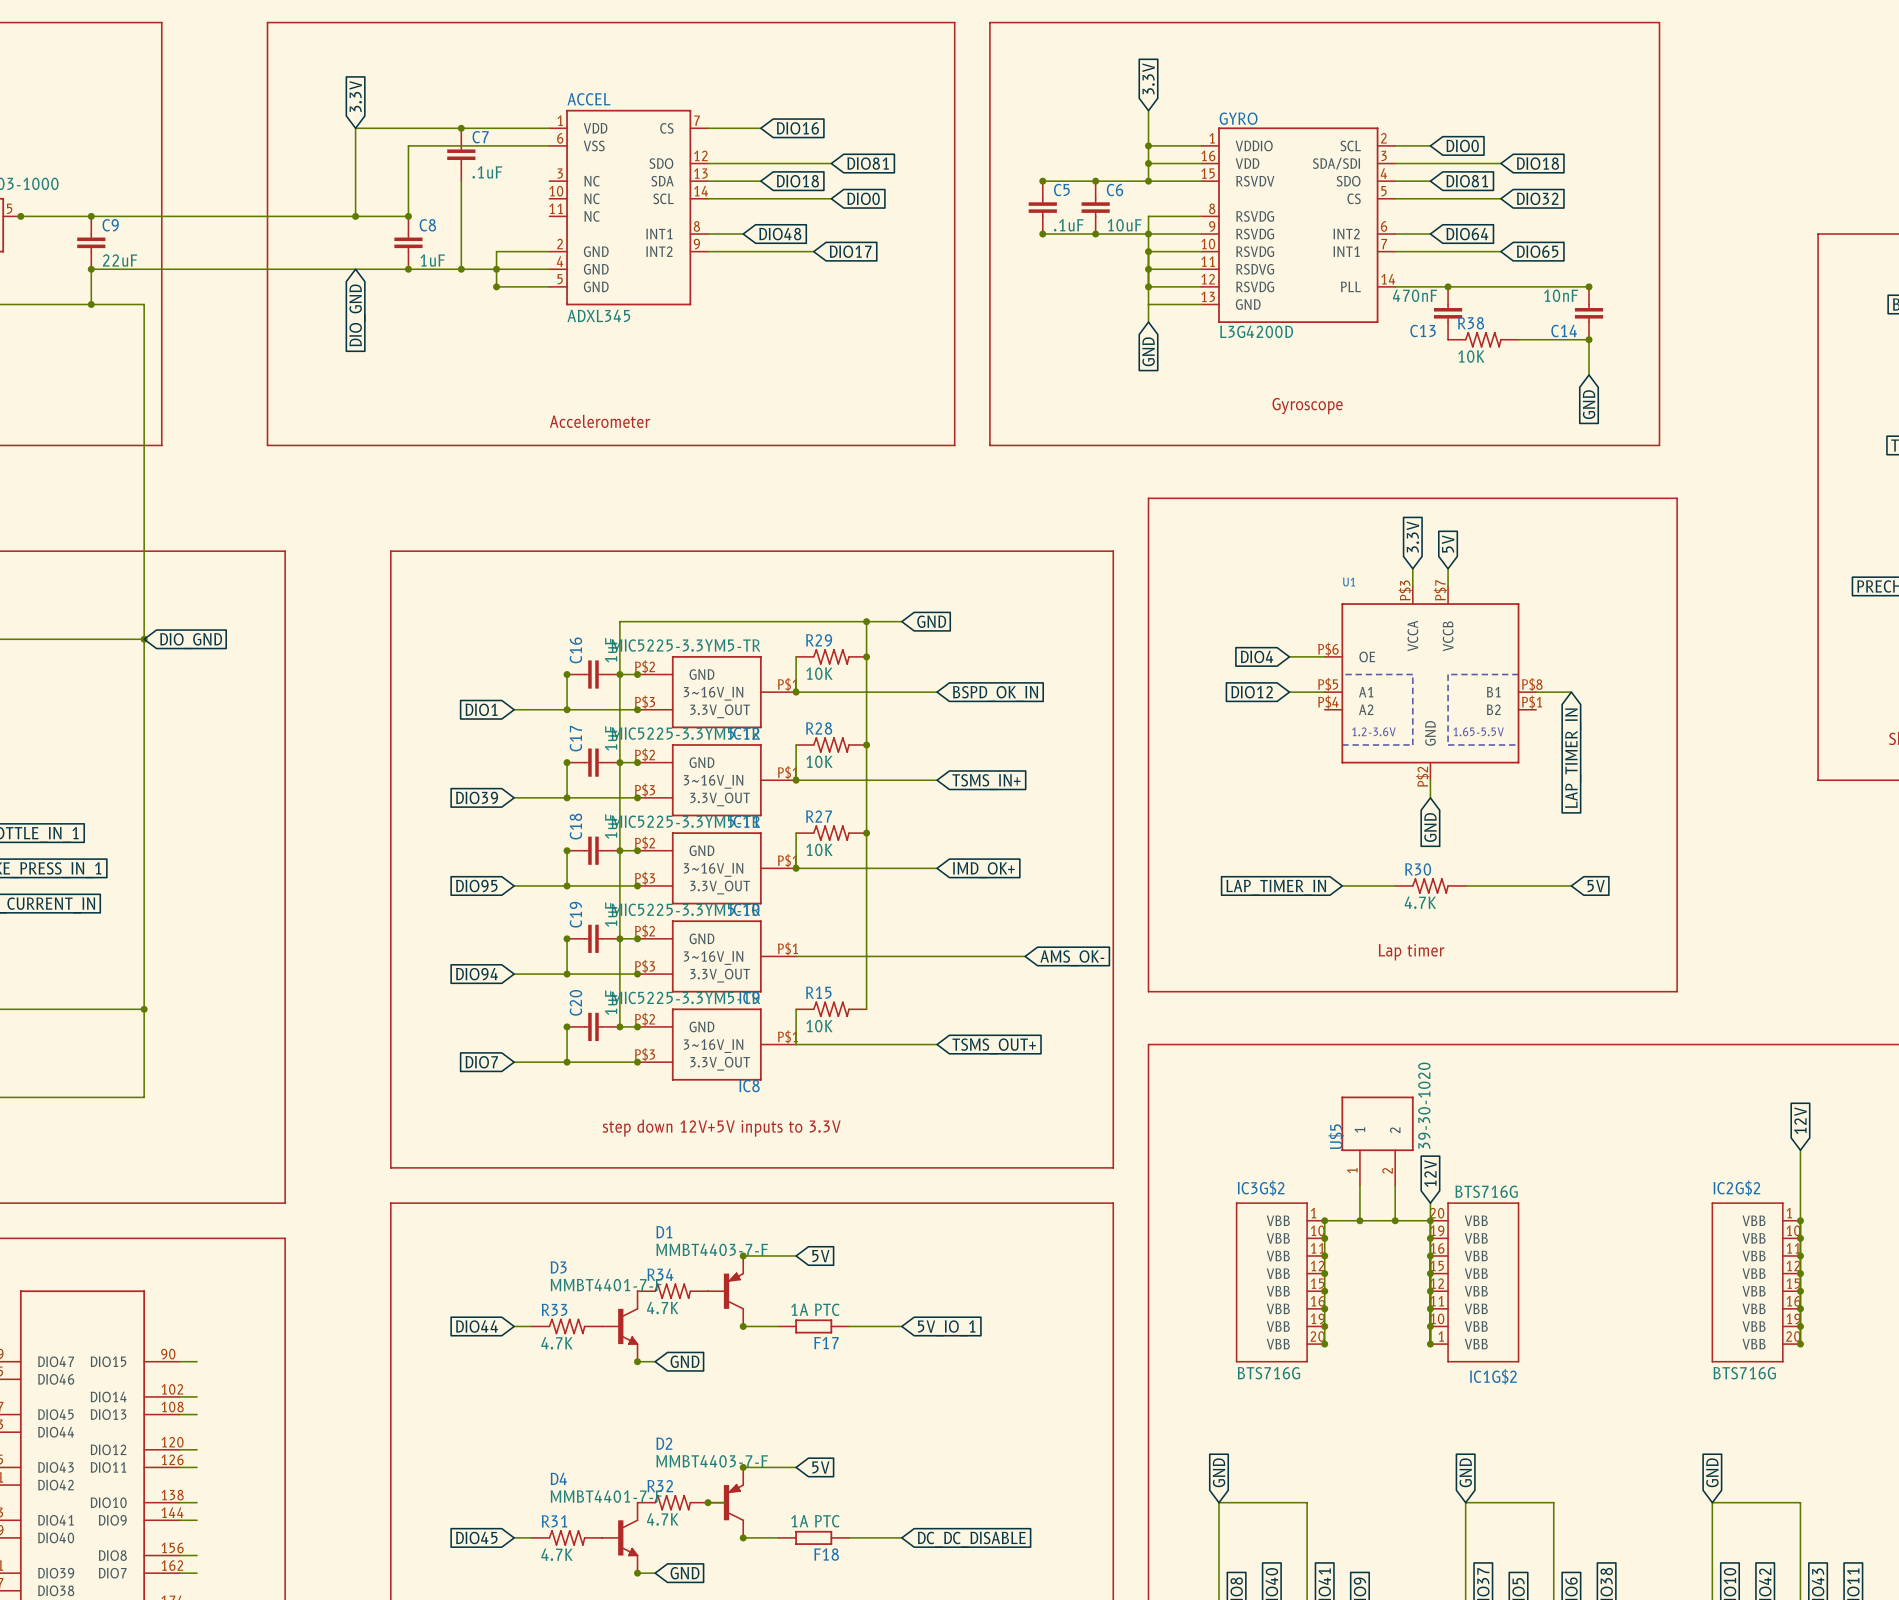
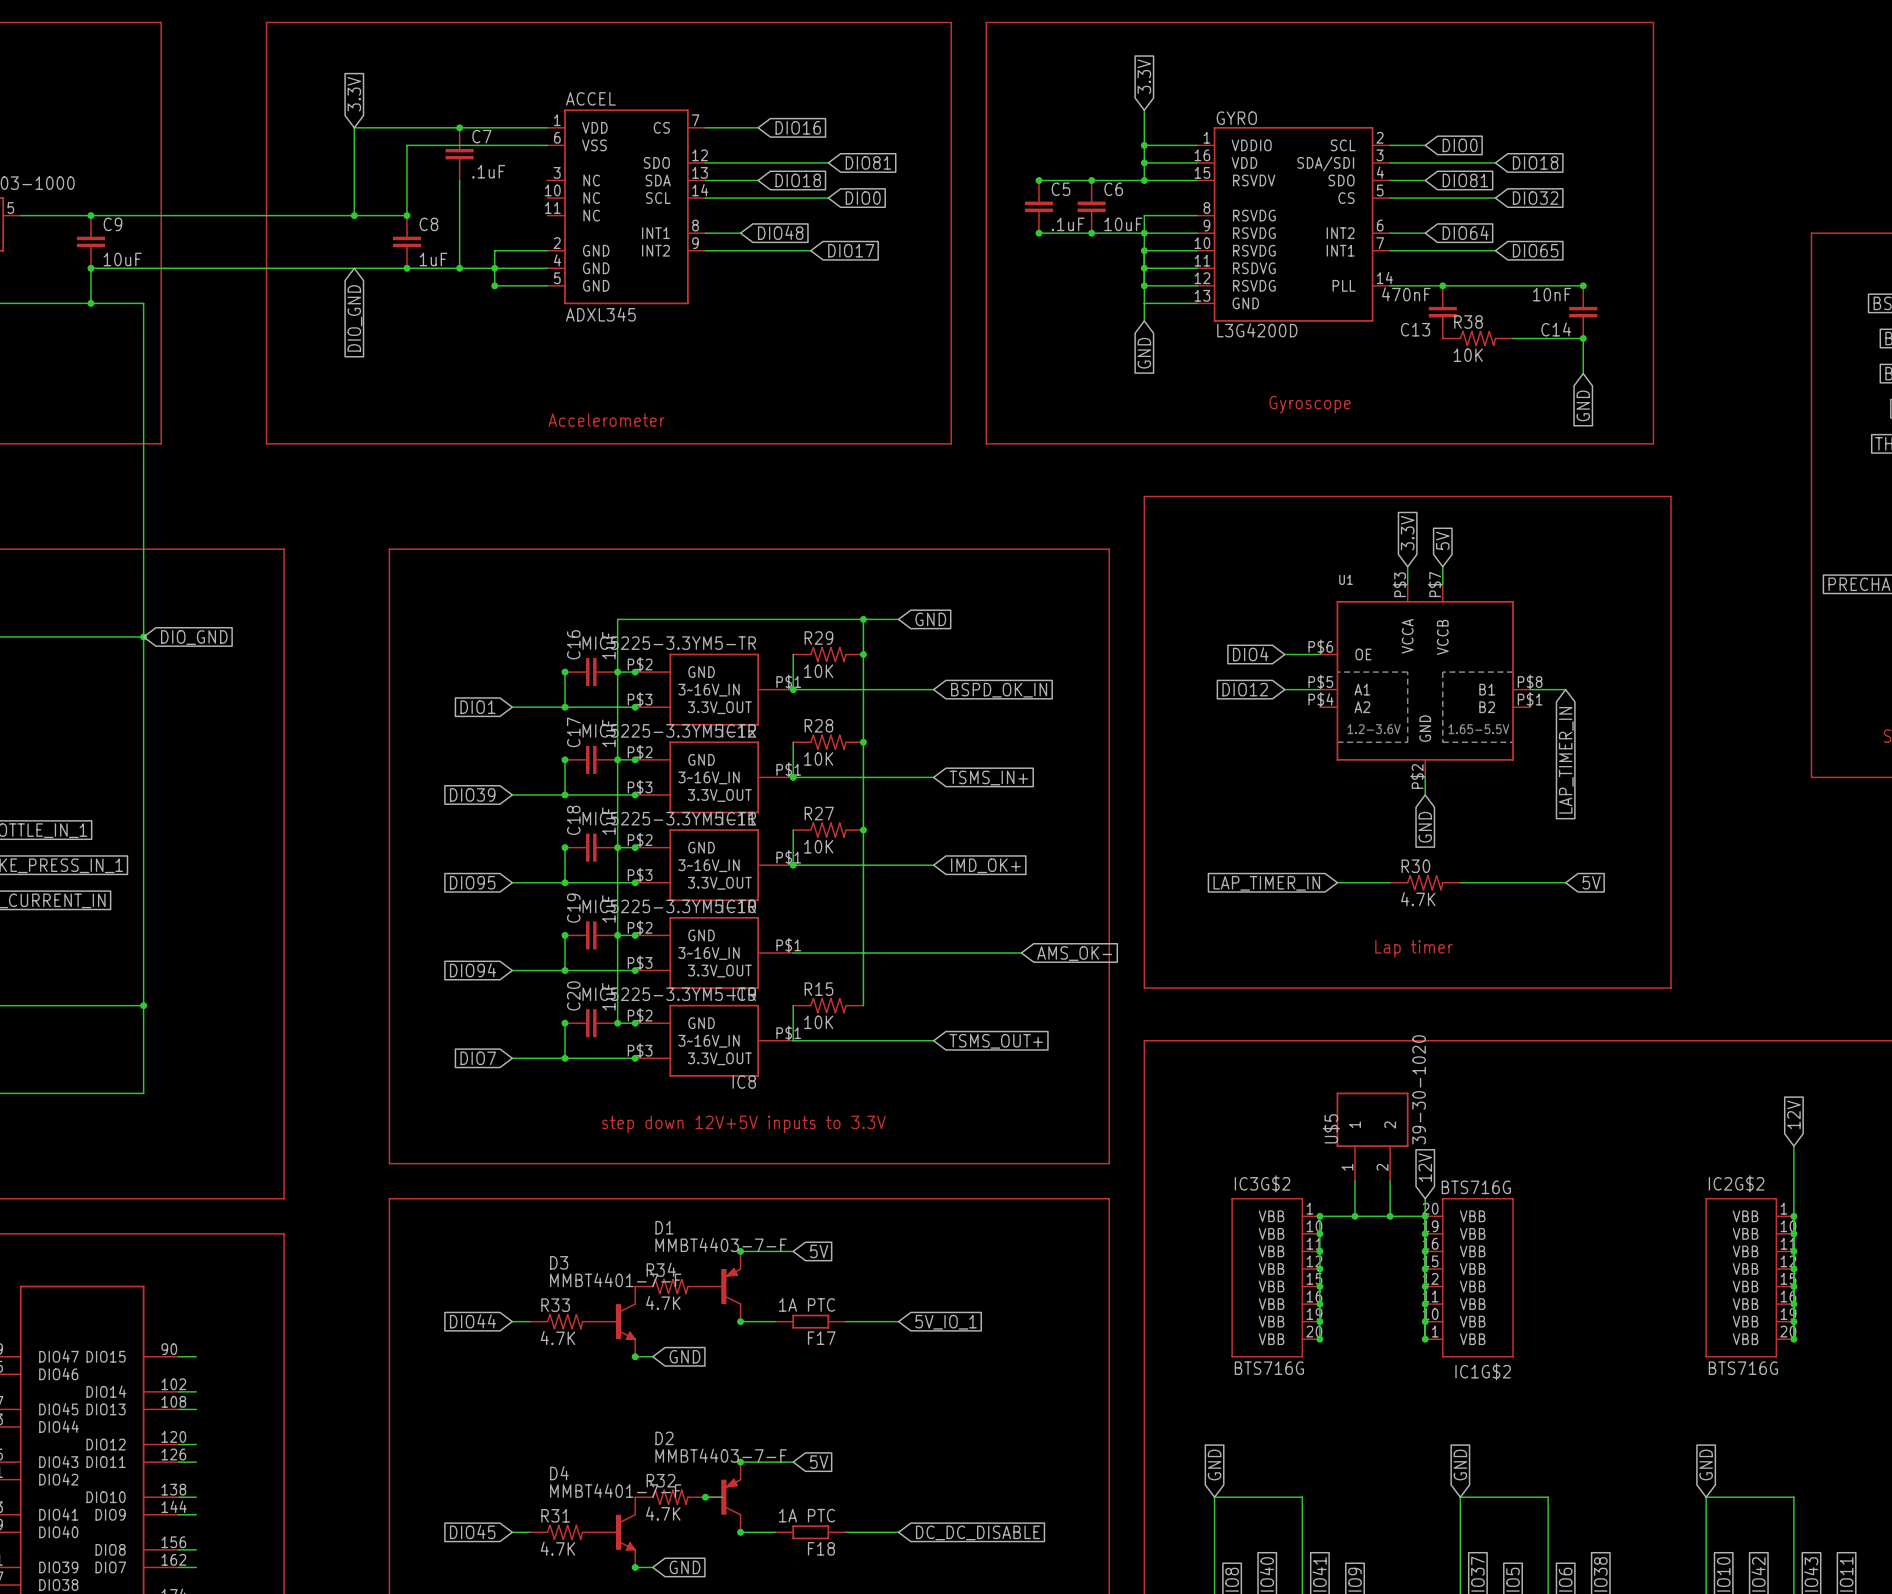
junction: (20, 216) -> none
C9 value: 22uF (120, 260) -> 10uF (122, 259)

